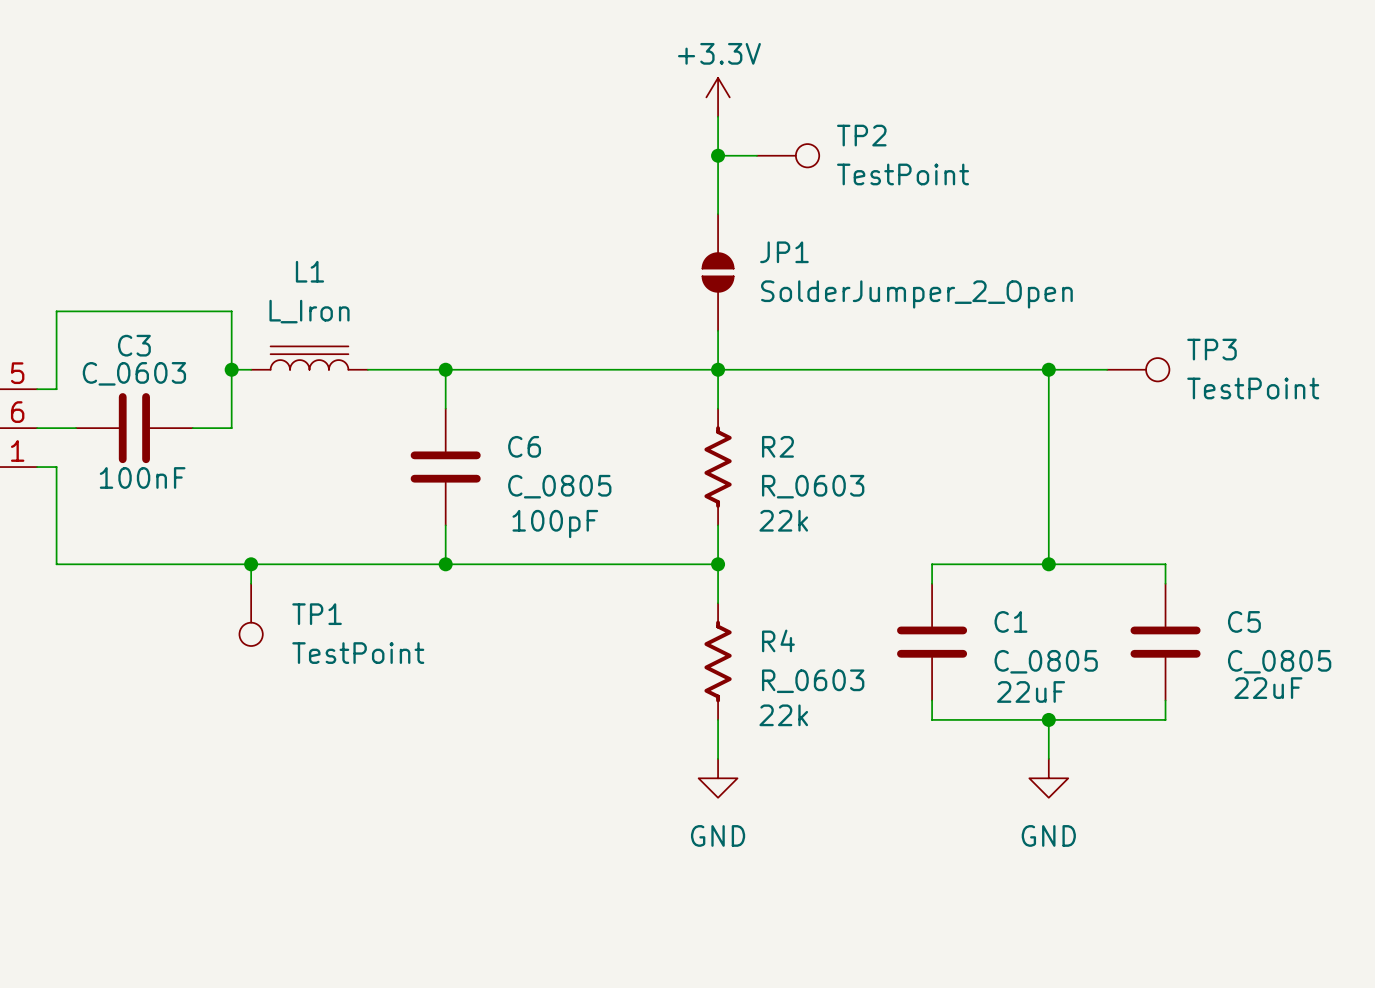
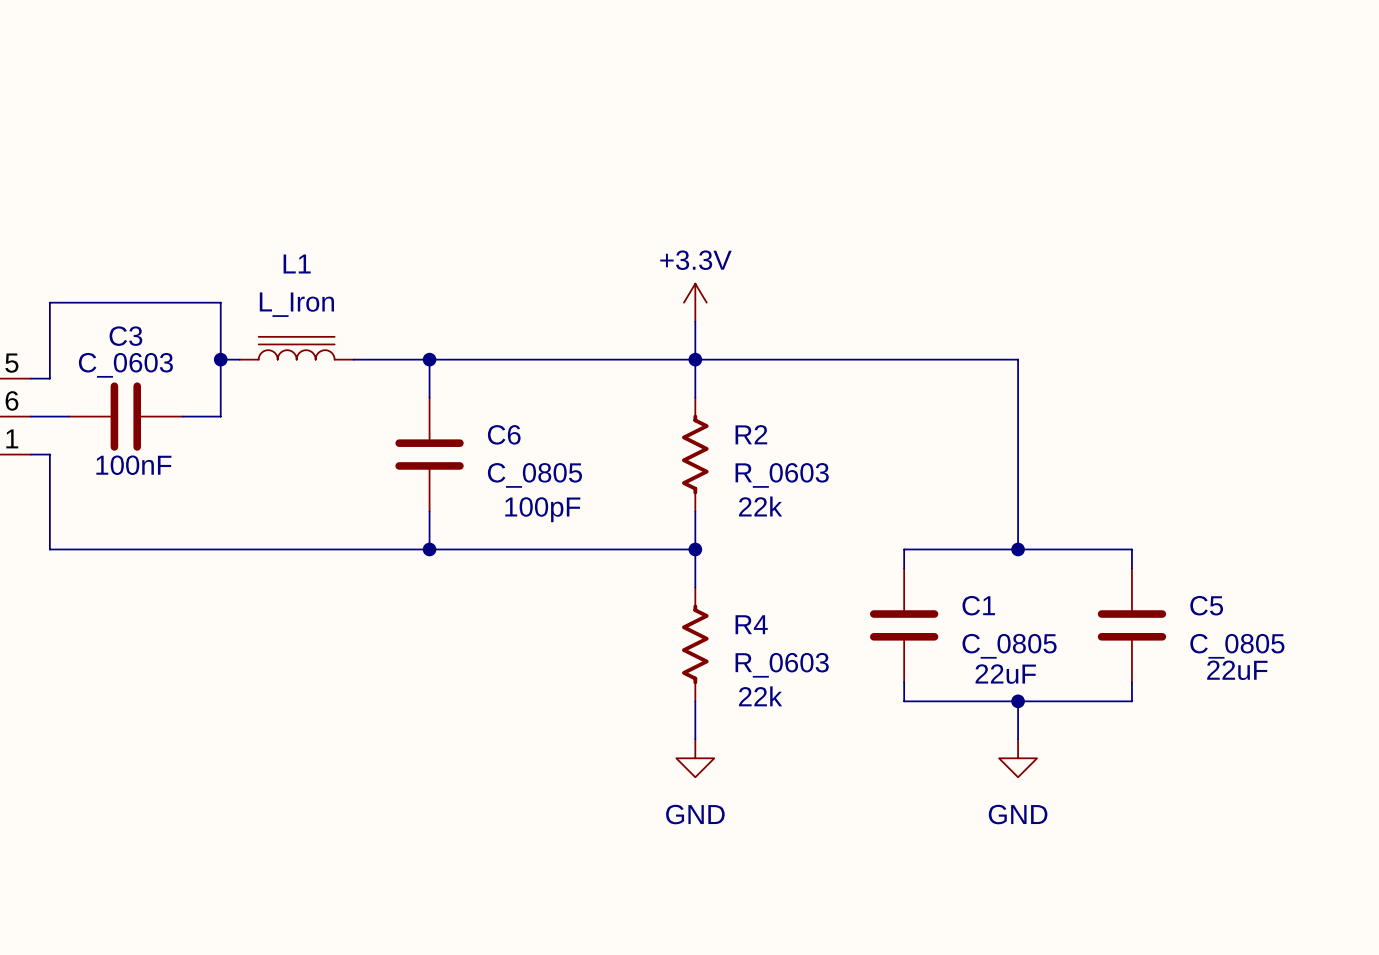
power symbol position: +3.3V (718, 97) -> +3.3V (695, 302)
wire: (718, 116) (718, 214) -> none
wire: (718, 155) (756, 155) -> none
junction: (718, 155) -> none
TP2: TestPoint (788, 155) -> none
JP1: SolderJumper_2_Open (718, 272) -> none
wire: (1048, 369) (1107, 369) -> none
junction: (1048, 369) -> none
TP3: TestPoint (1138, 369) -> none
wire: (251, 564) (251, 583) -> none
junction: (251, 564) -> none
TP1: TestPoint (251, 614) -> none

